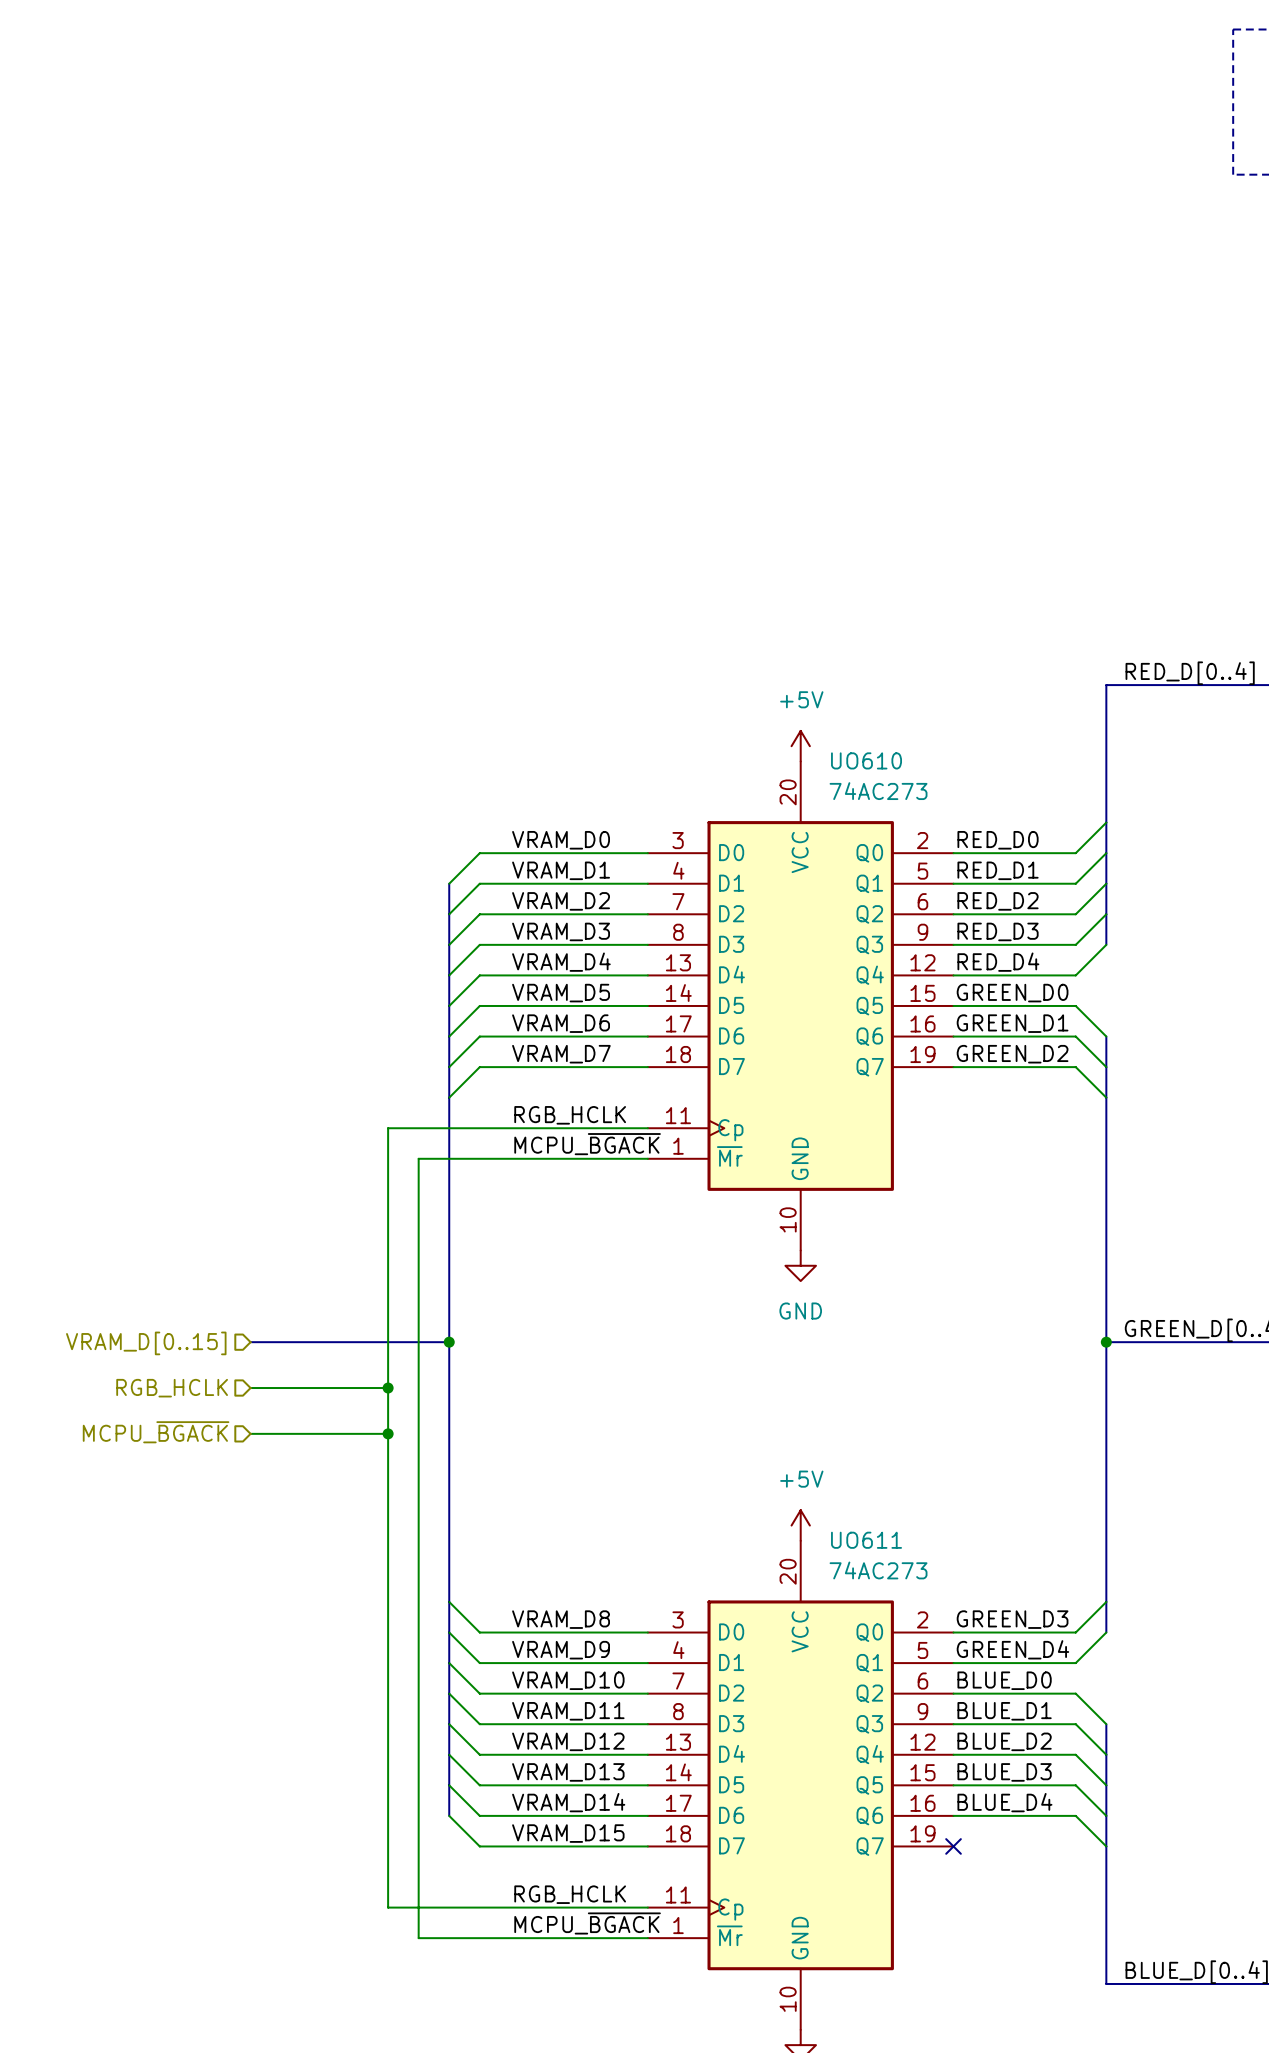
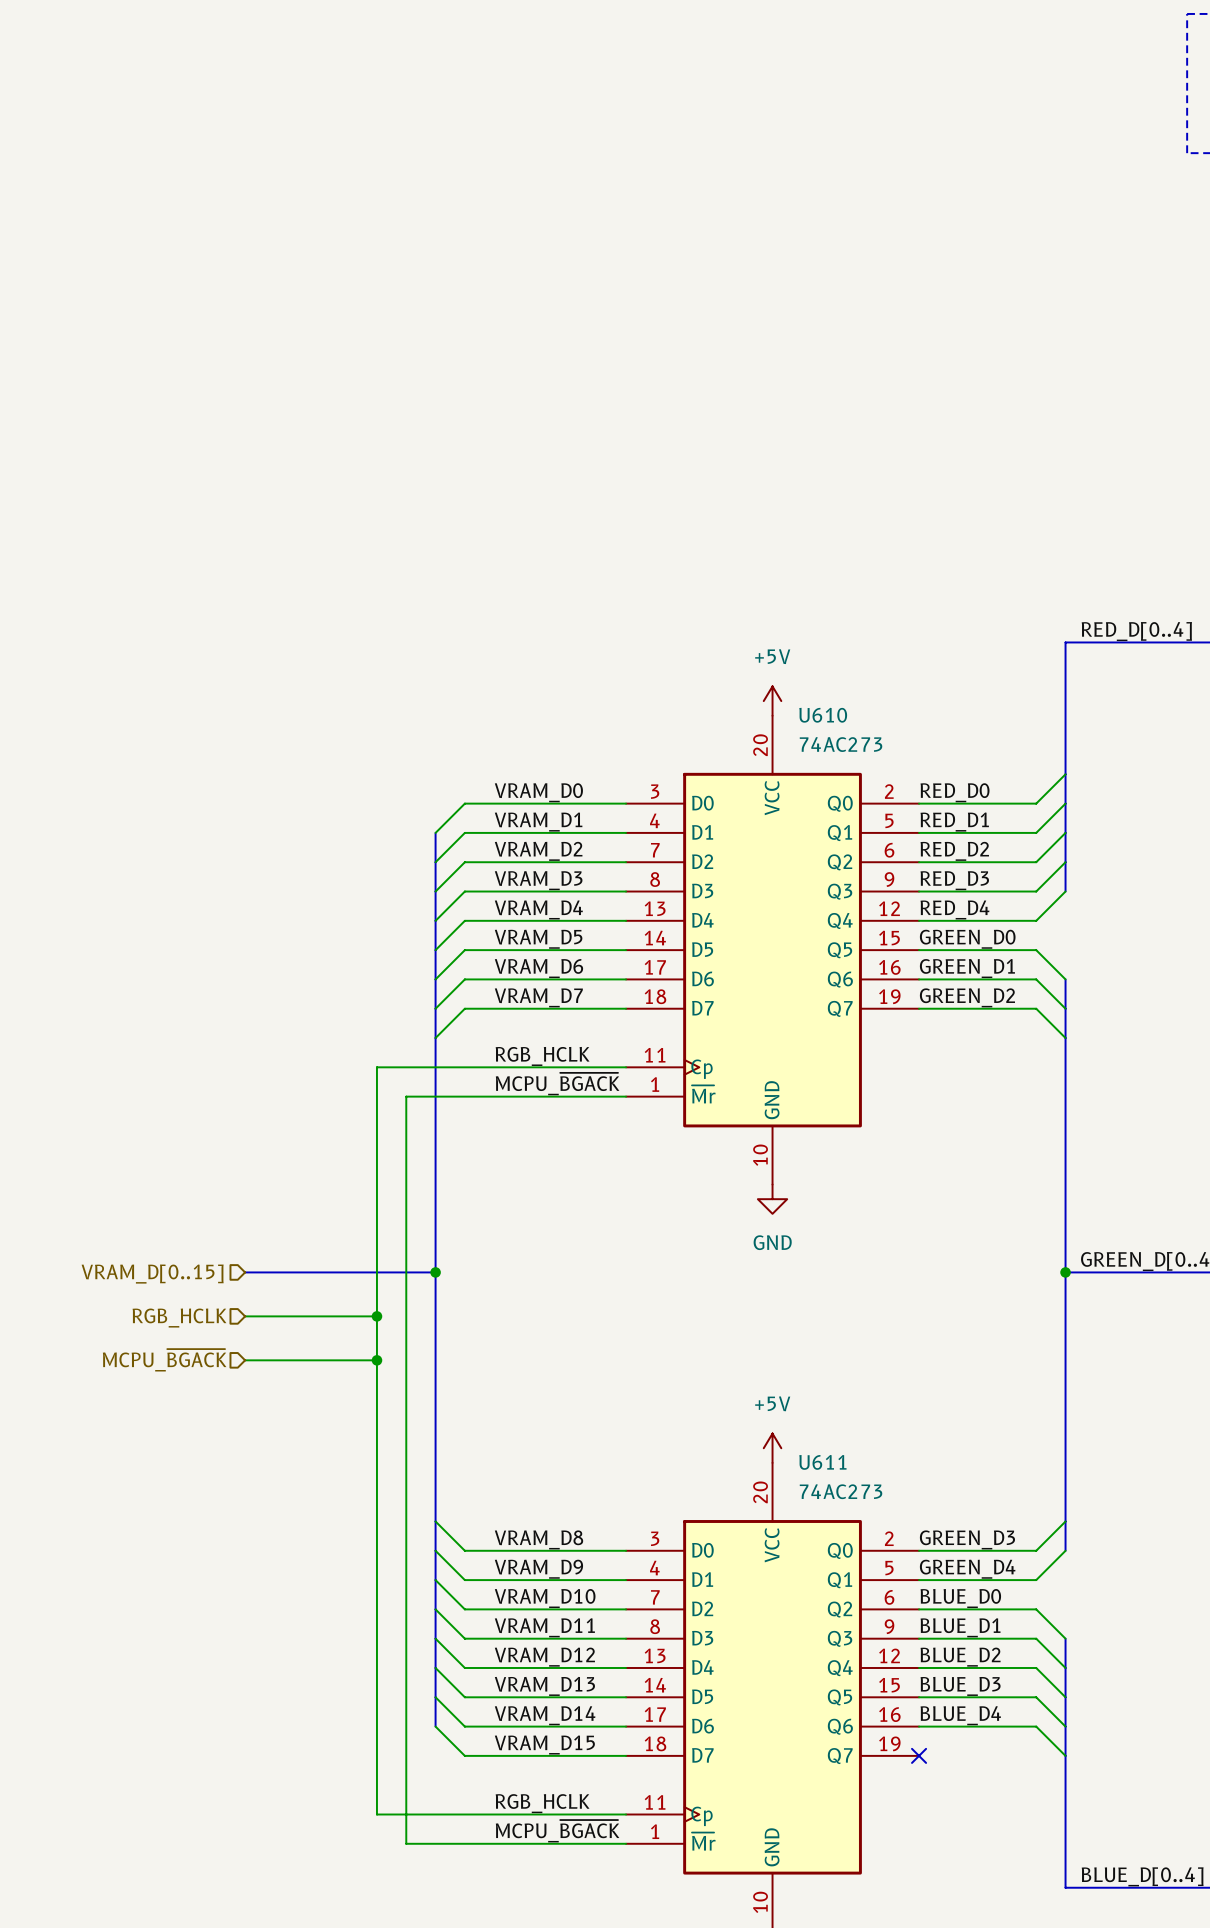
UO610 name: UO610 (866, 760) -> U610 (823, 715)
UO611 name: UO611 (866, 1540) -> U611 (822, 1462)

